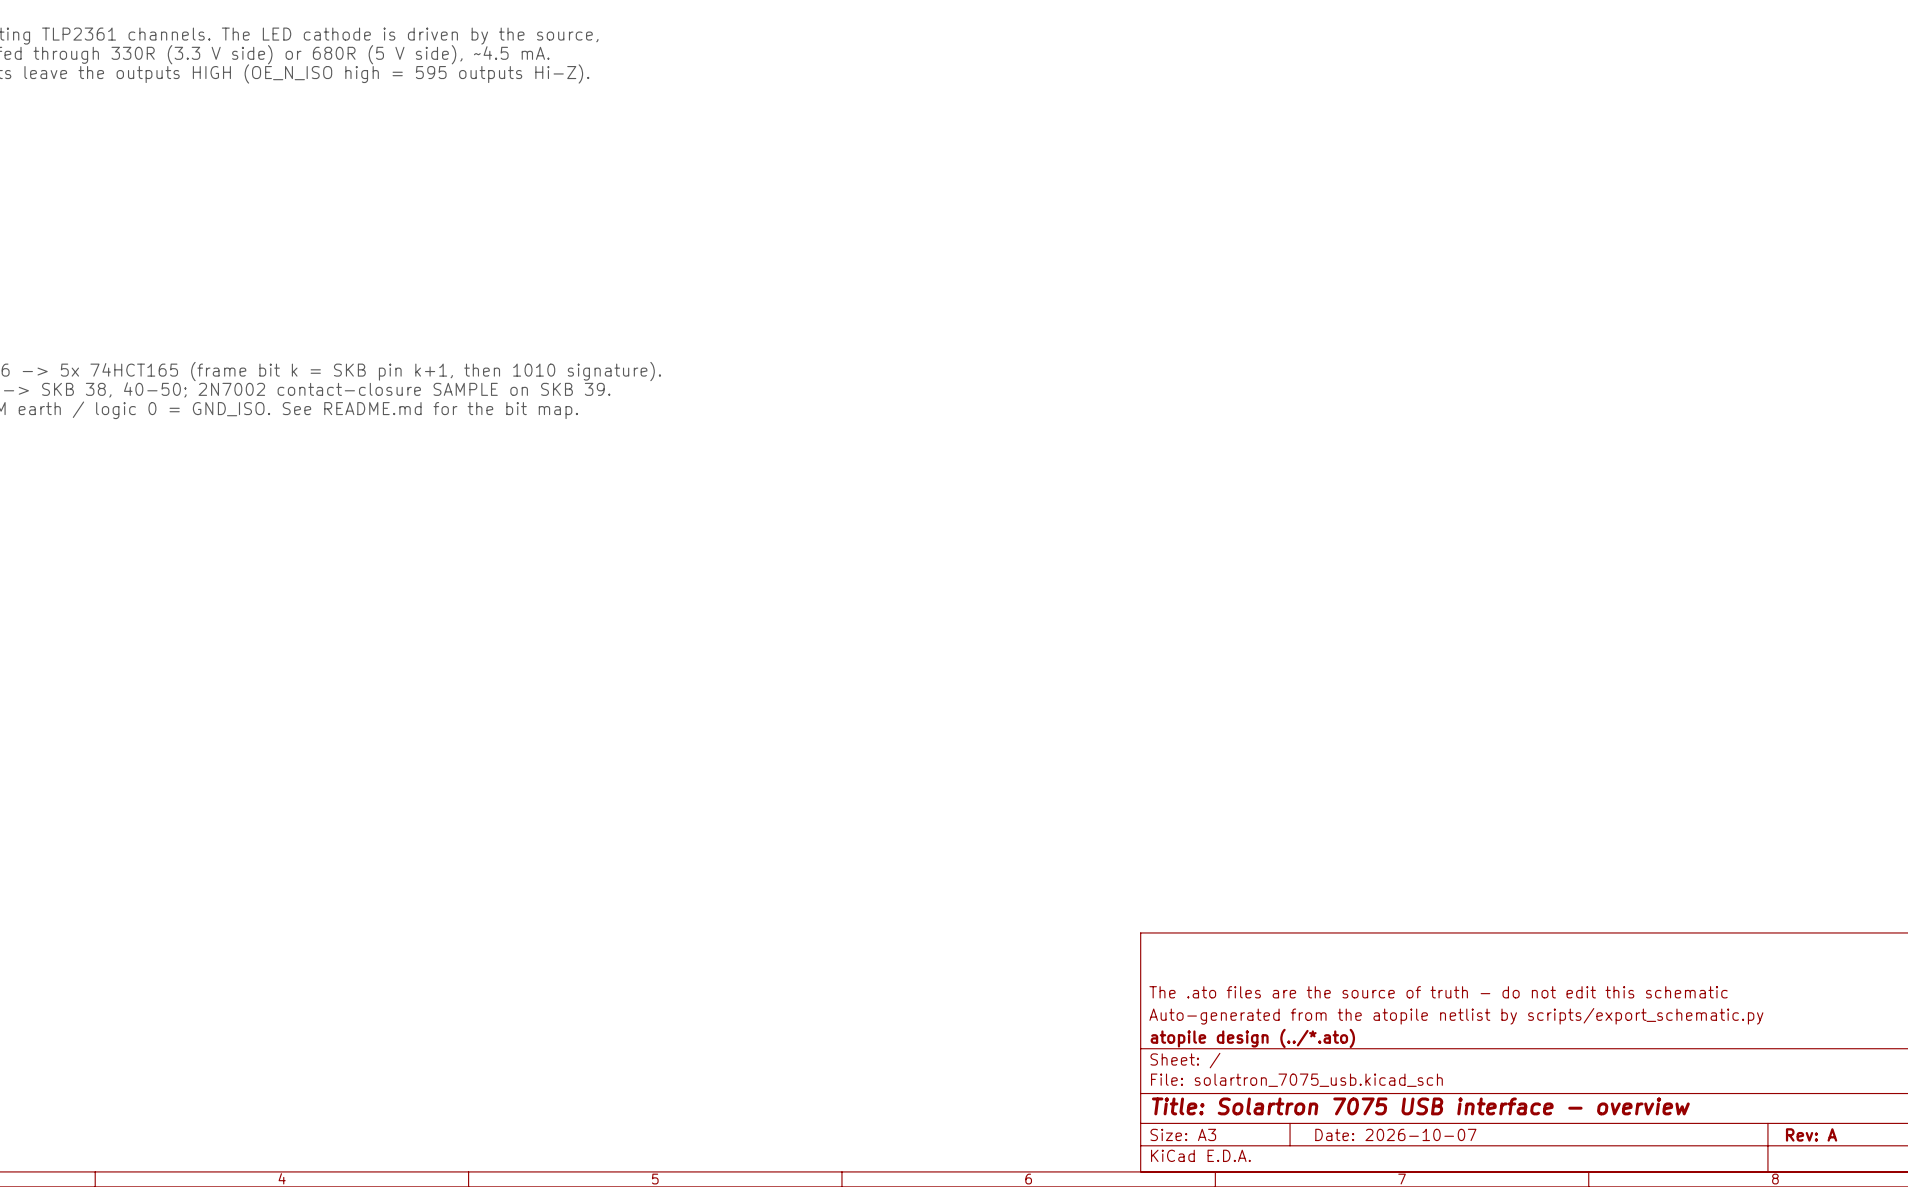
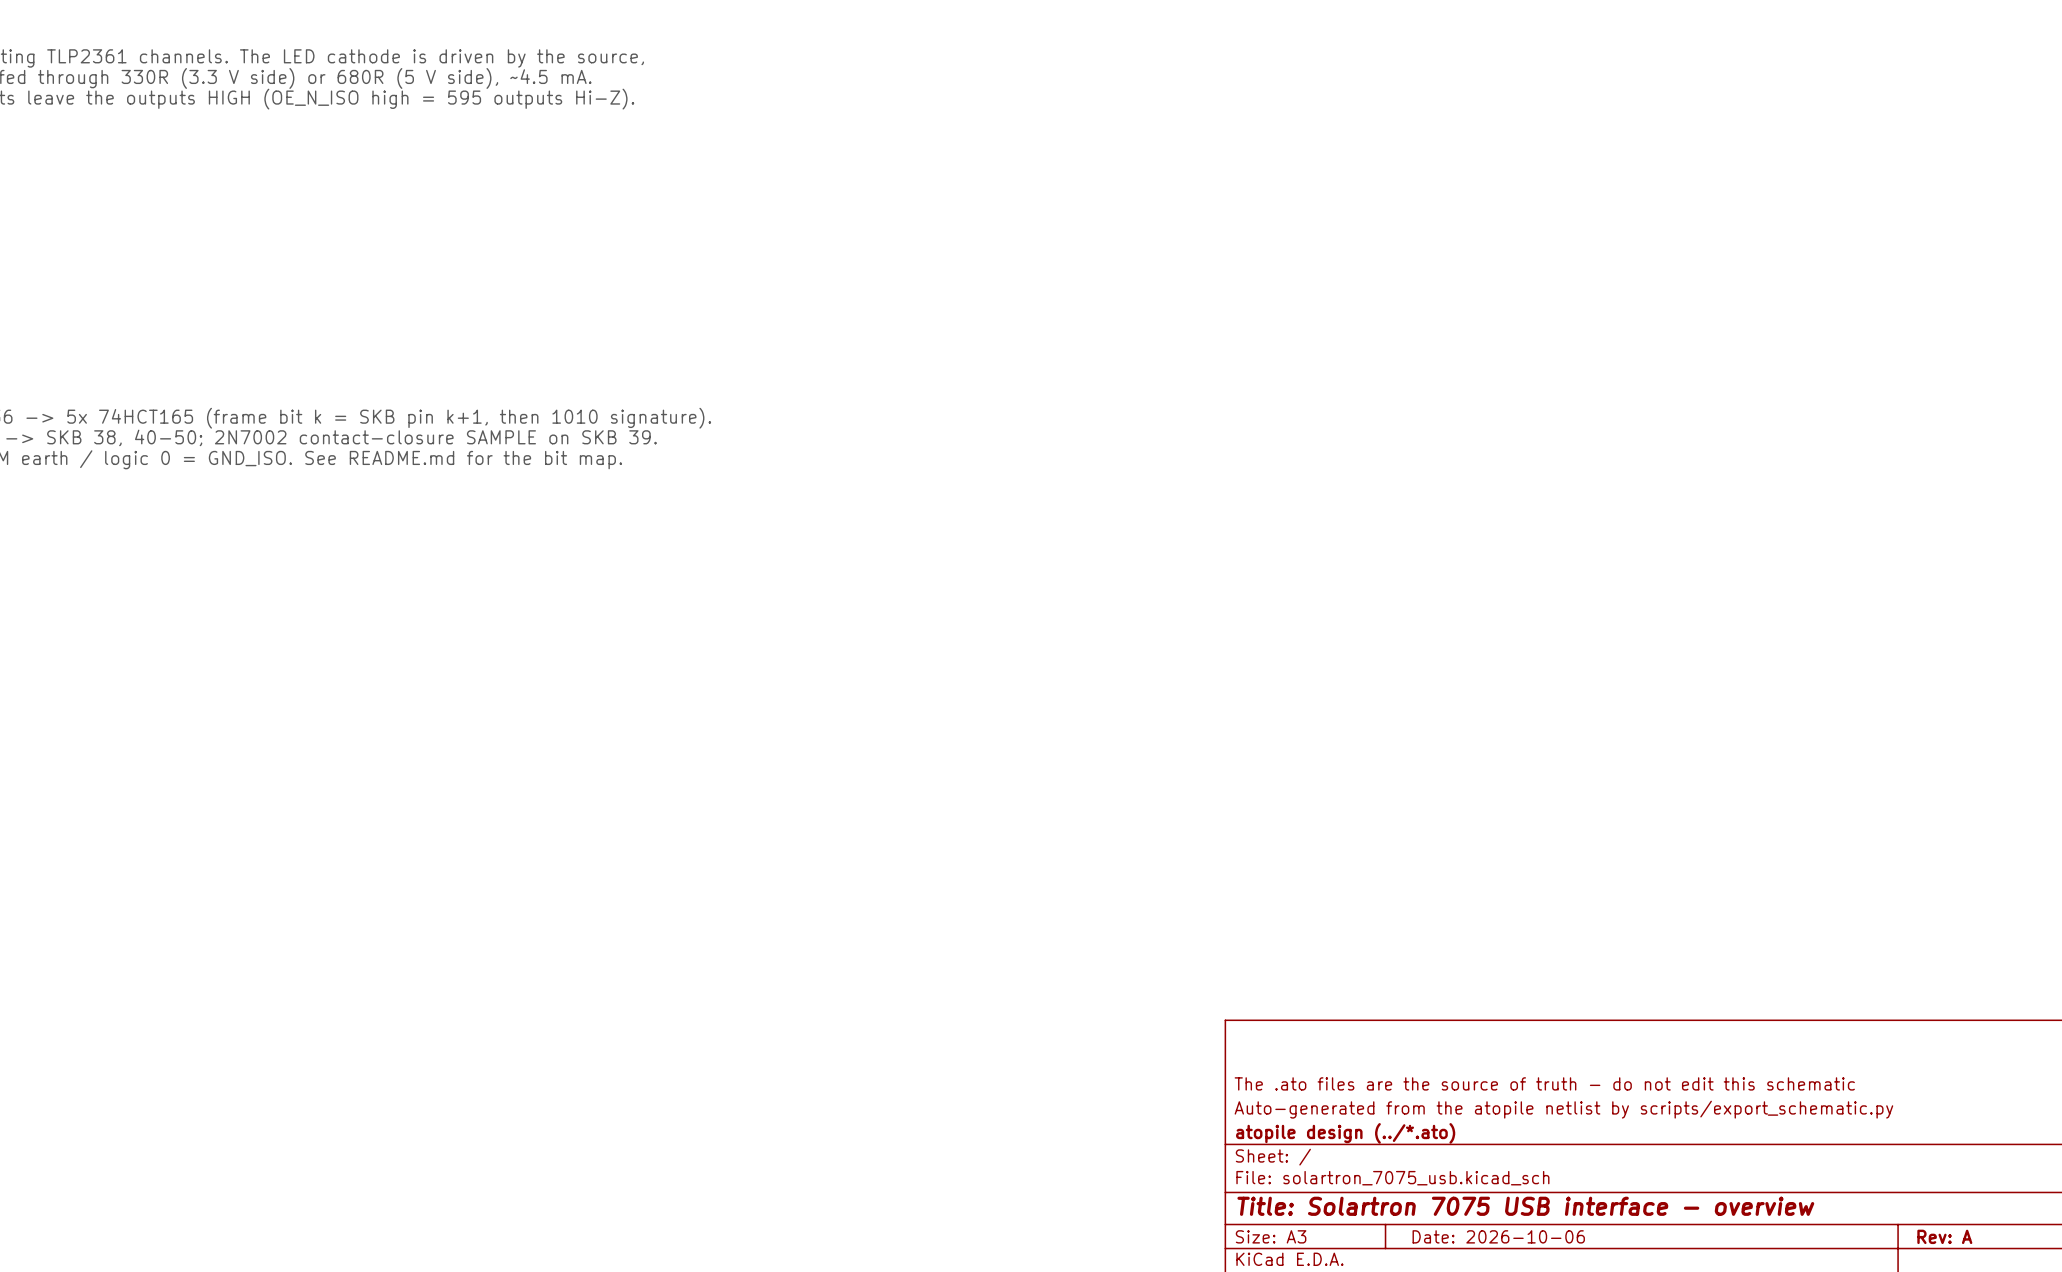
title block: Date: 2026-10-07 (1395, 1134) -> Date: 2026-10-06 (1498, 1236)

